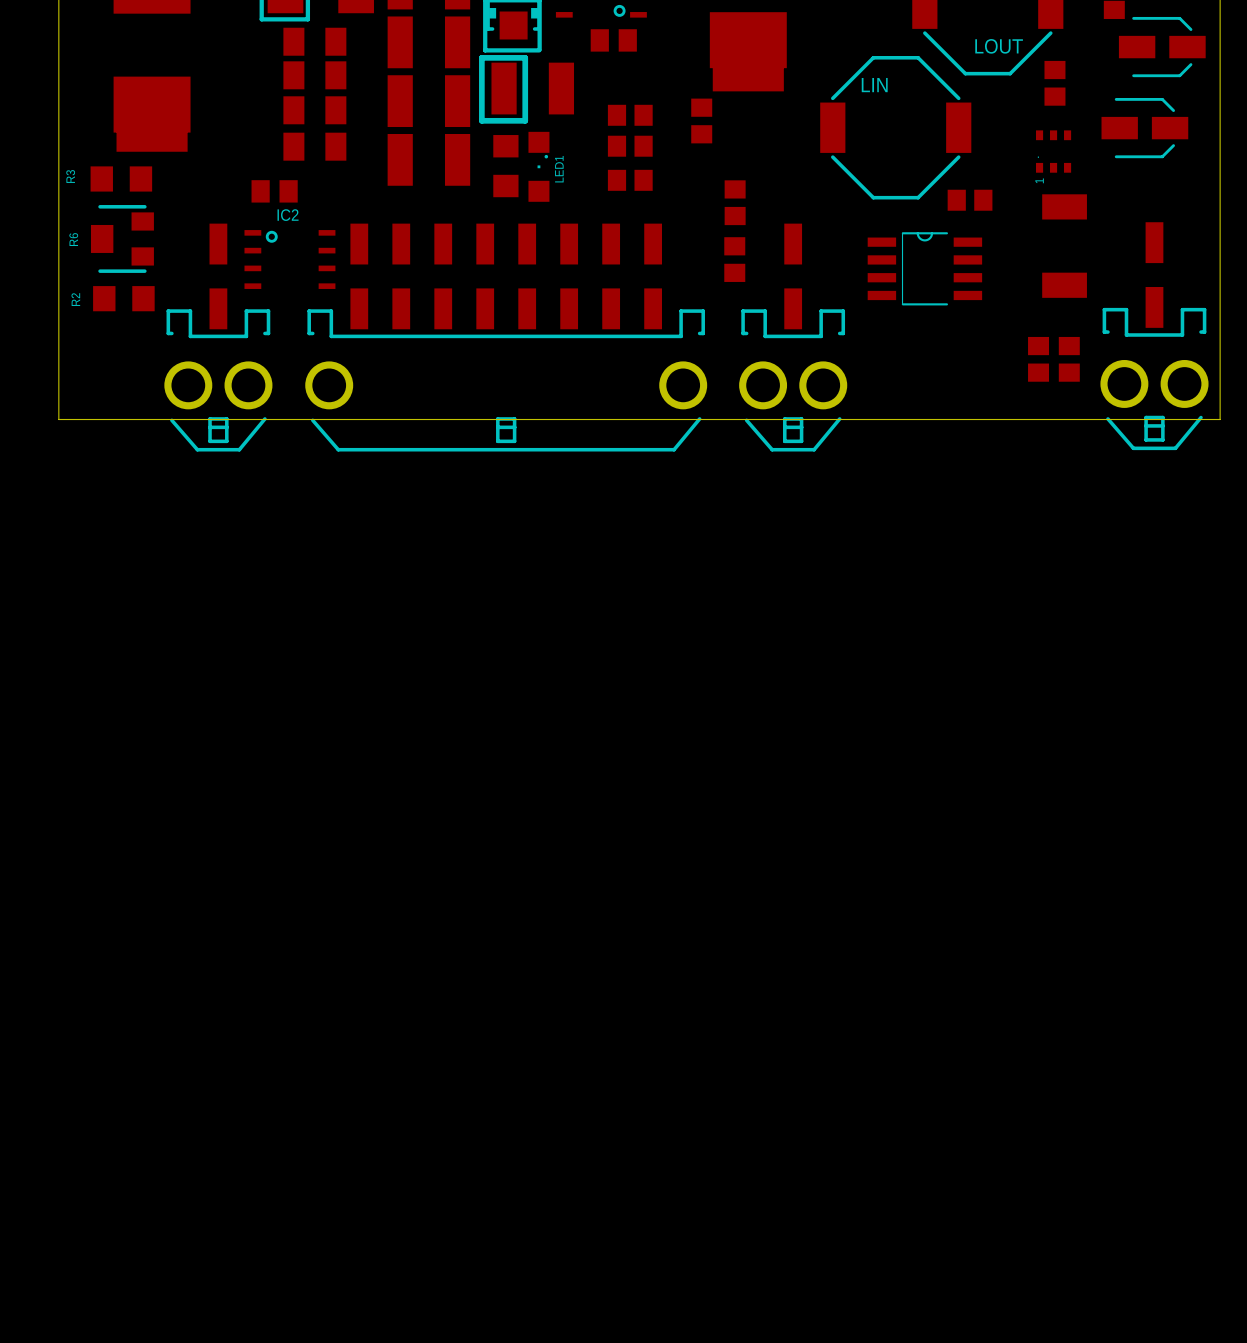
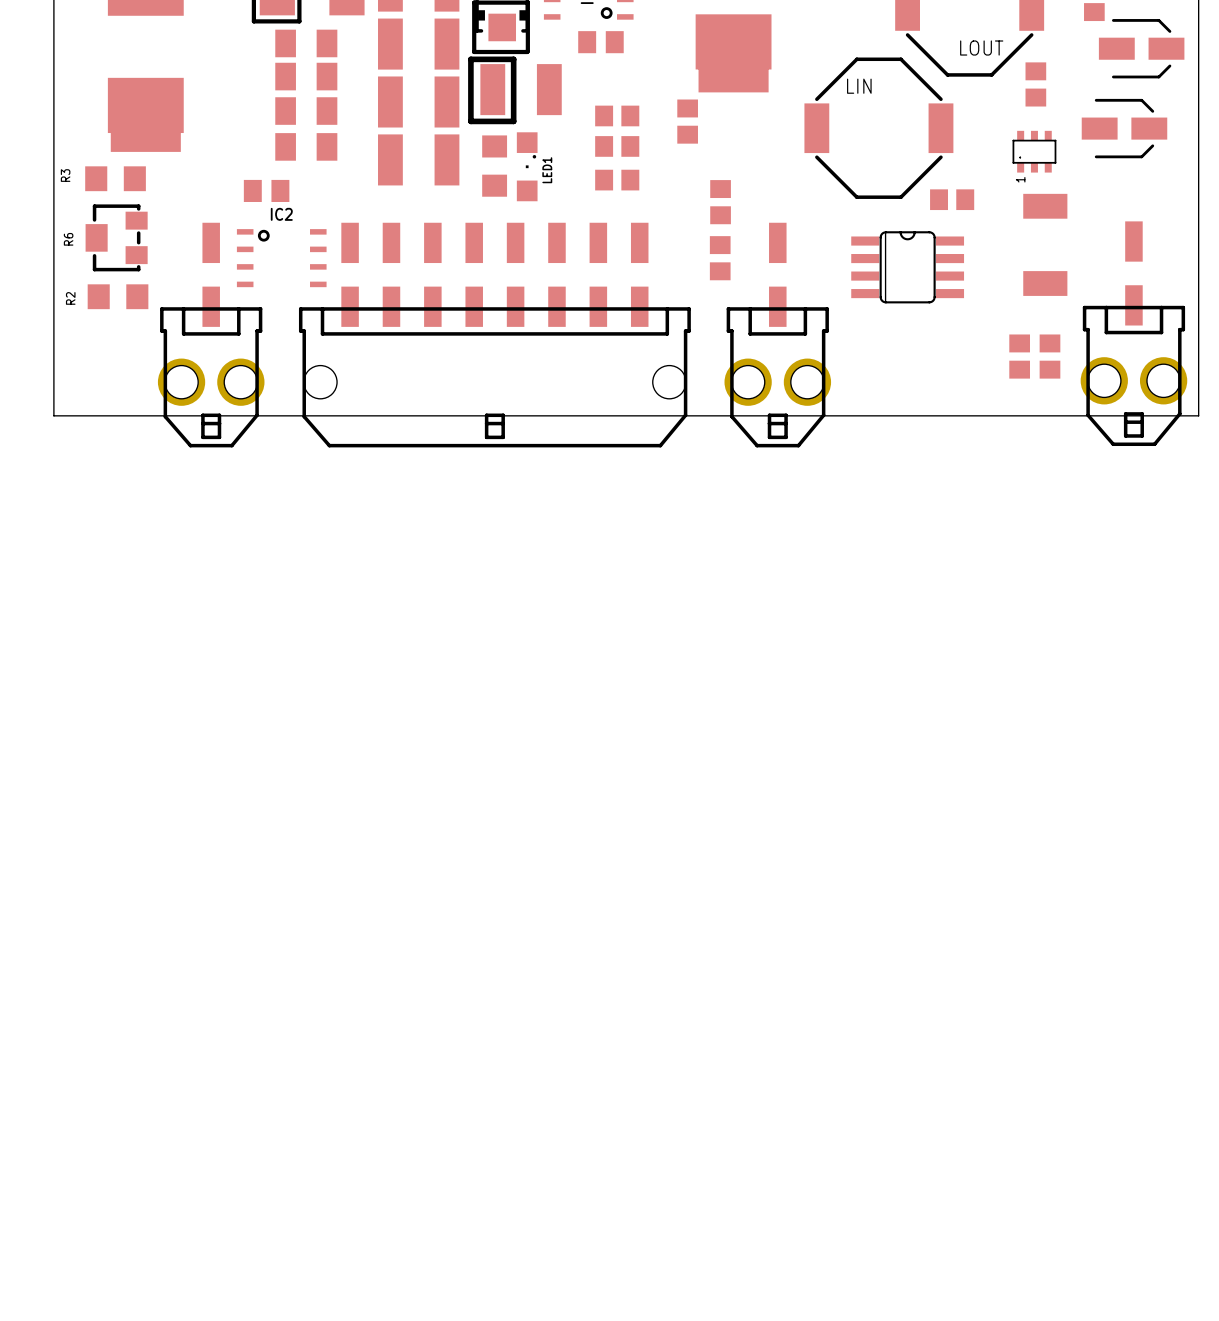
part footprint: [1035, 130, 1072, 173] -> [1012, 130, 1057, 173]
R6 footprint: [90, 205, 154, 273] -> [85, 204, 148, 272]
part footprint: [1100, 222, 1209, 451] -> [1080, 221, 1188, 447]
part footprint: [164, 223, 273, 452] -> [157, 222, 265, 448]
part footprint: [305, 223, 708, 452] -> [298, 222, 691, 448]
part footprint: [739, 223, 848, 452] -> [724, 222, 832, 448]
part footprint: [867, 232, 983, 306] -> [851, 231, 965, 304]

